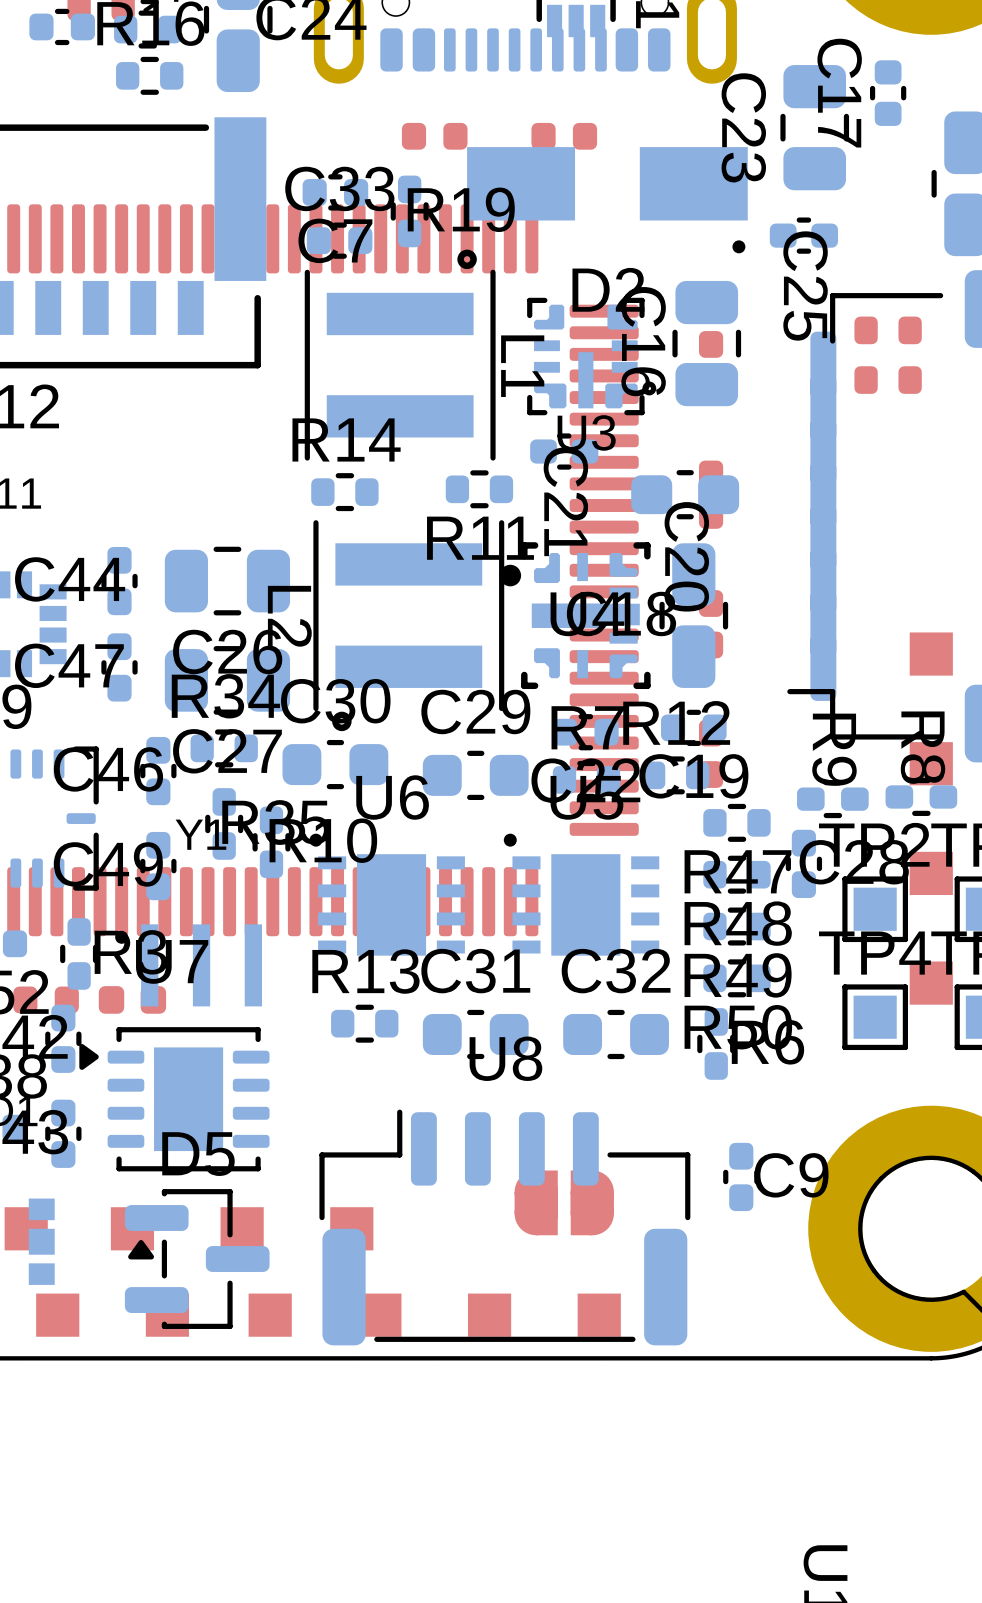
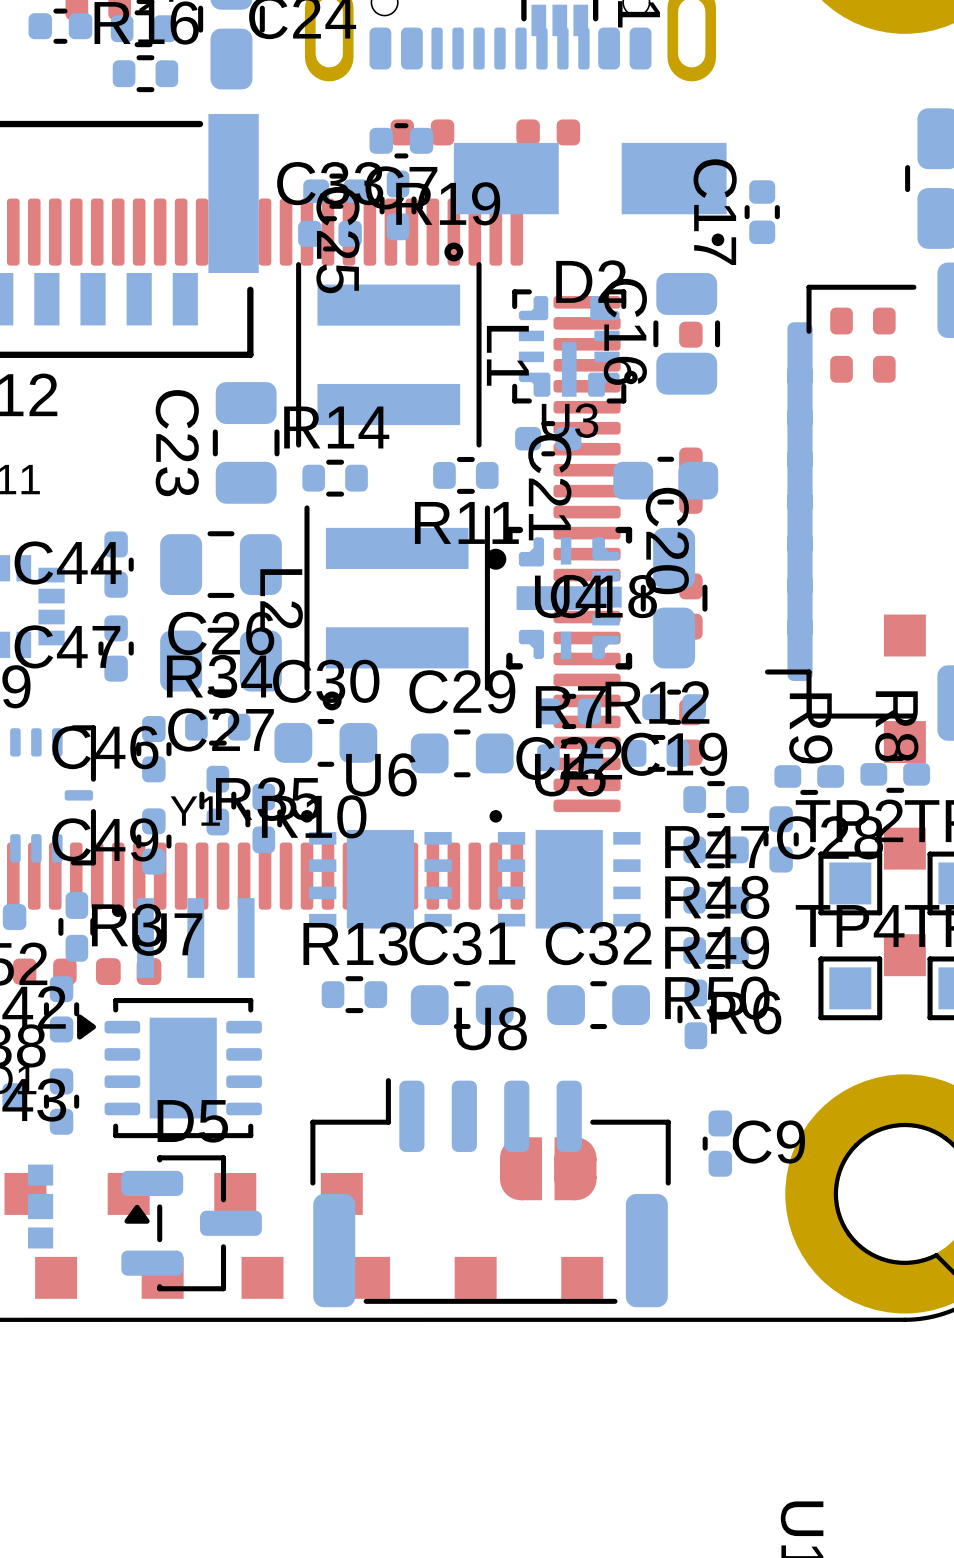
C17 position: (888, 93) -> (762, 212)
C23 position: (814, 127) -> (246, 442)
C7 position: (335, 192) -> (401, 140)
C25 position: (803, 235) -> (336, 191)

